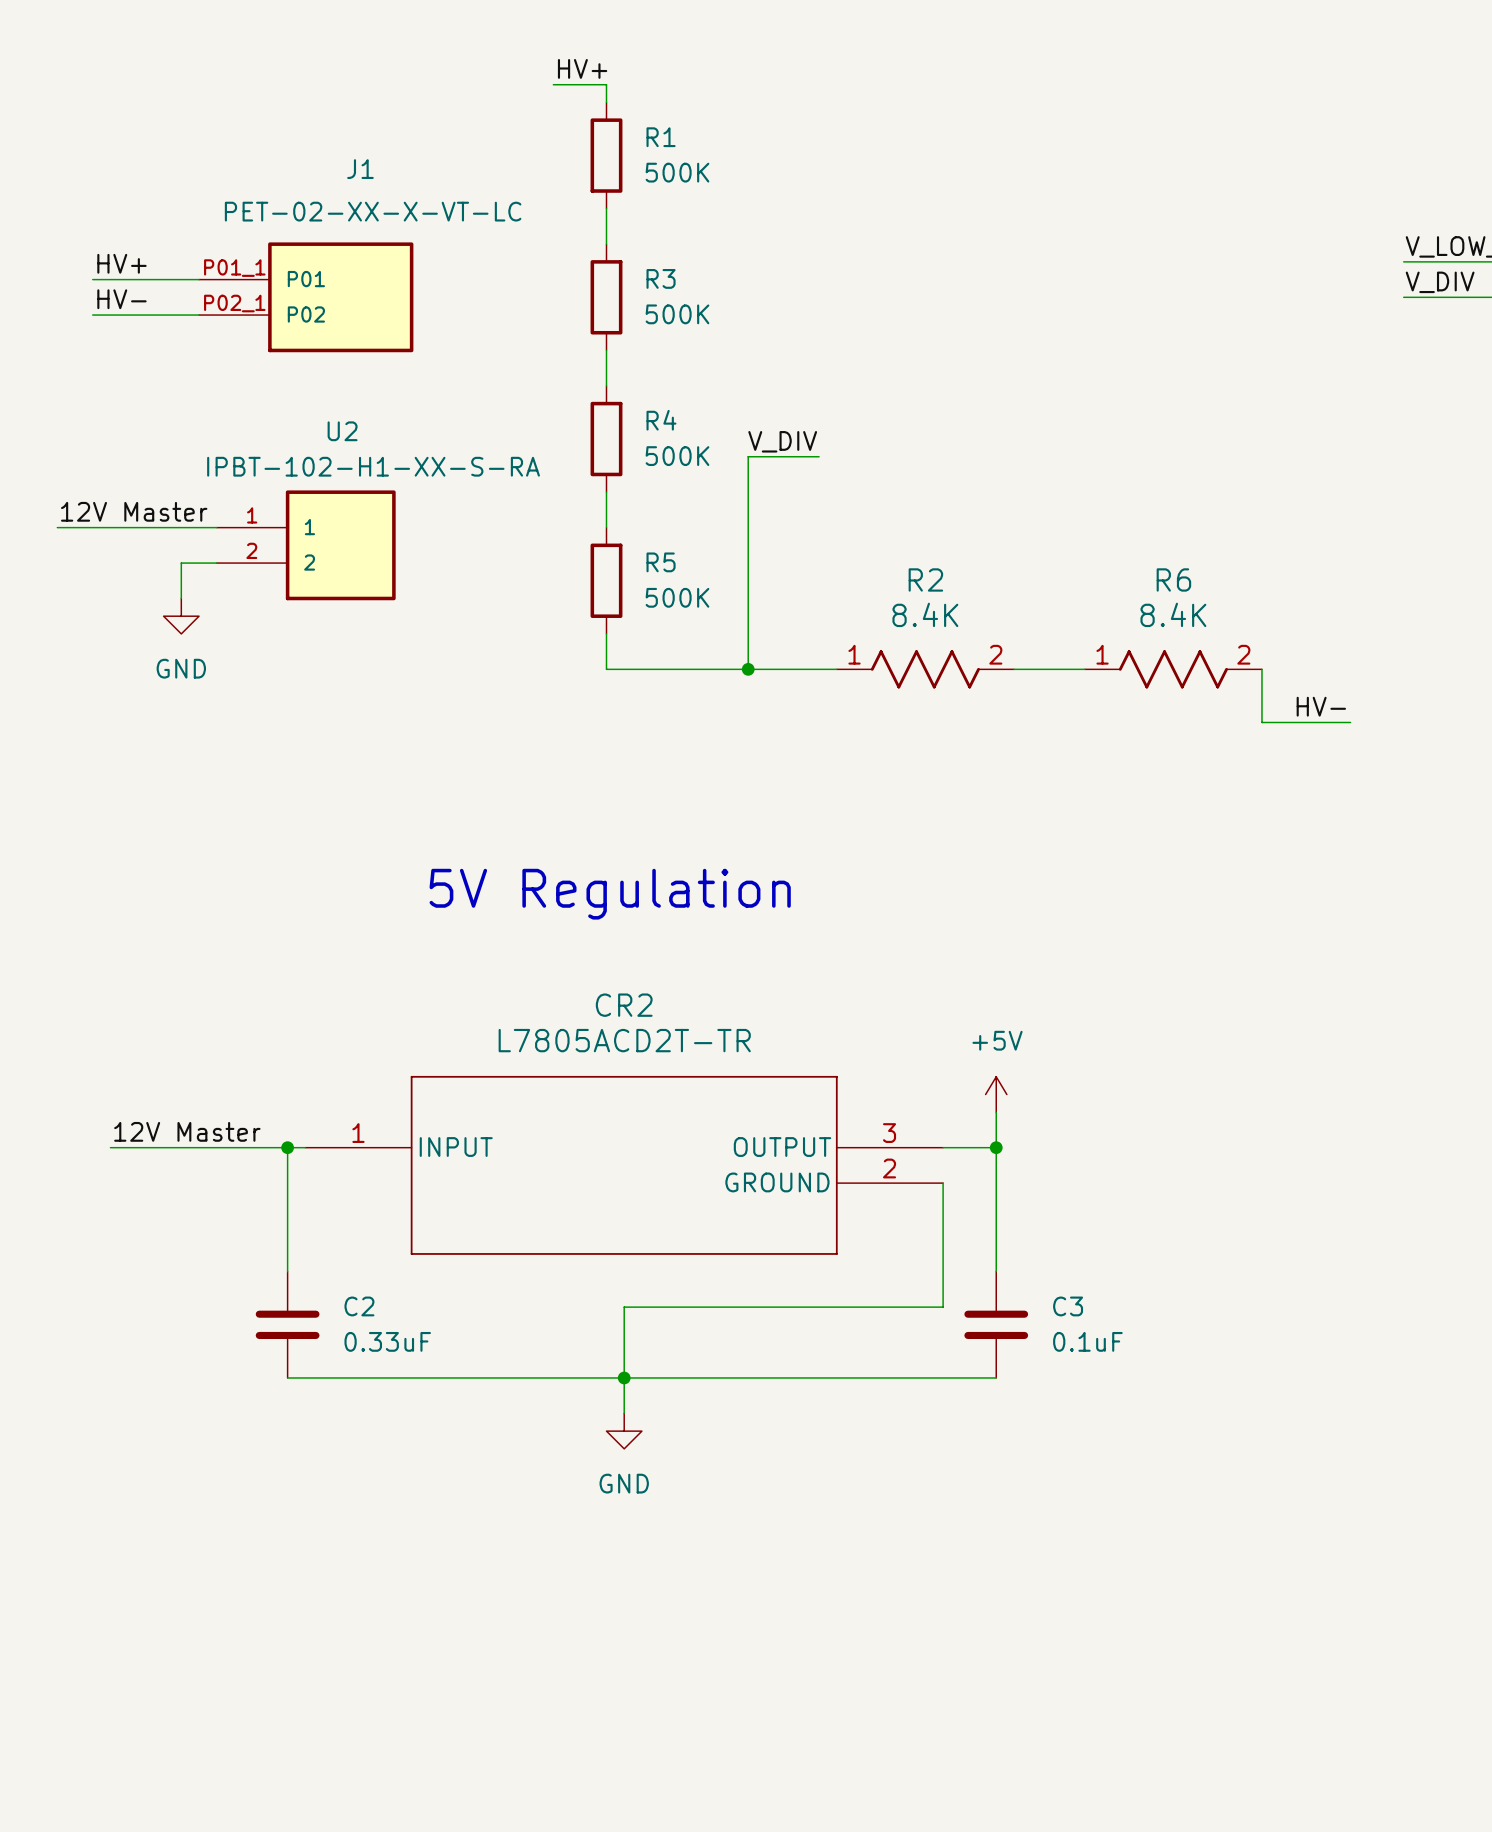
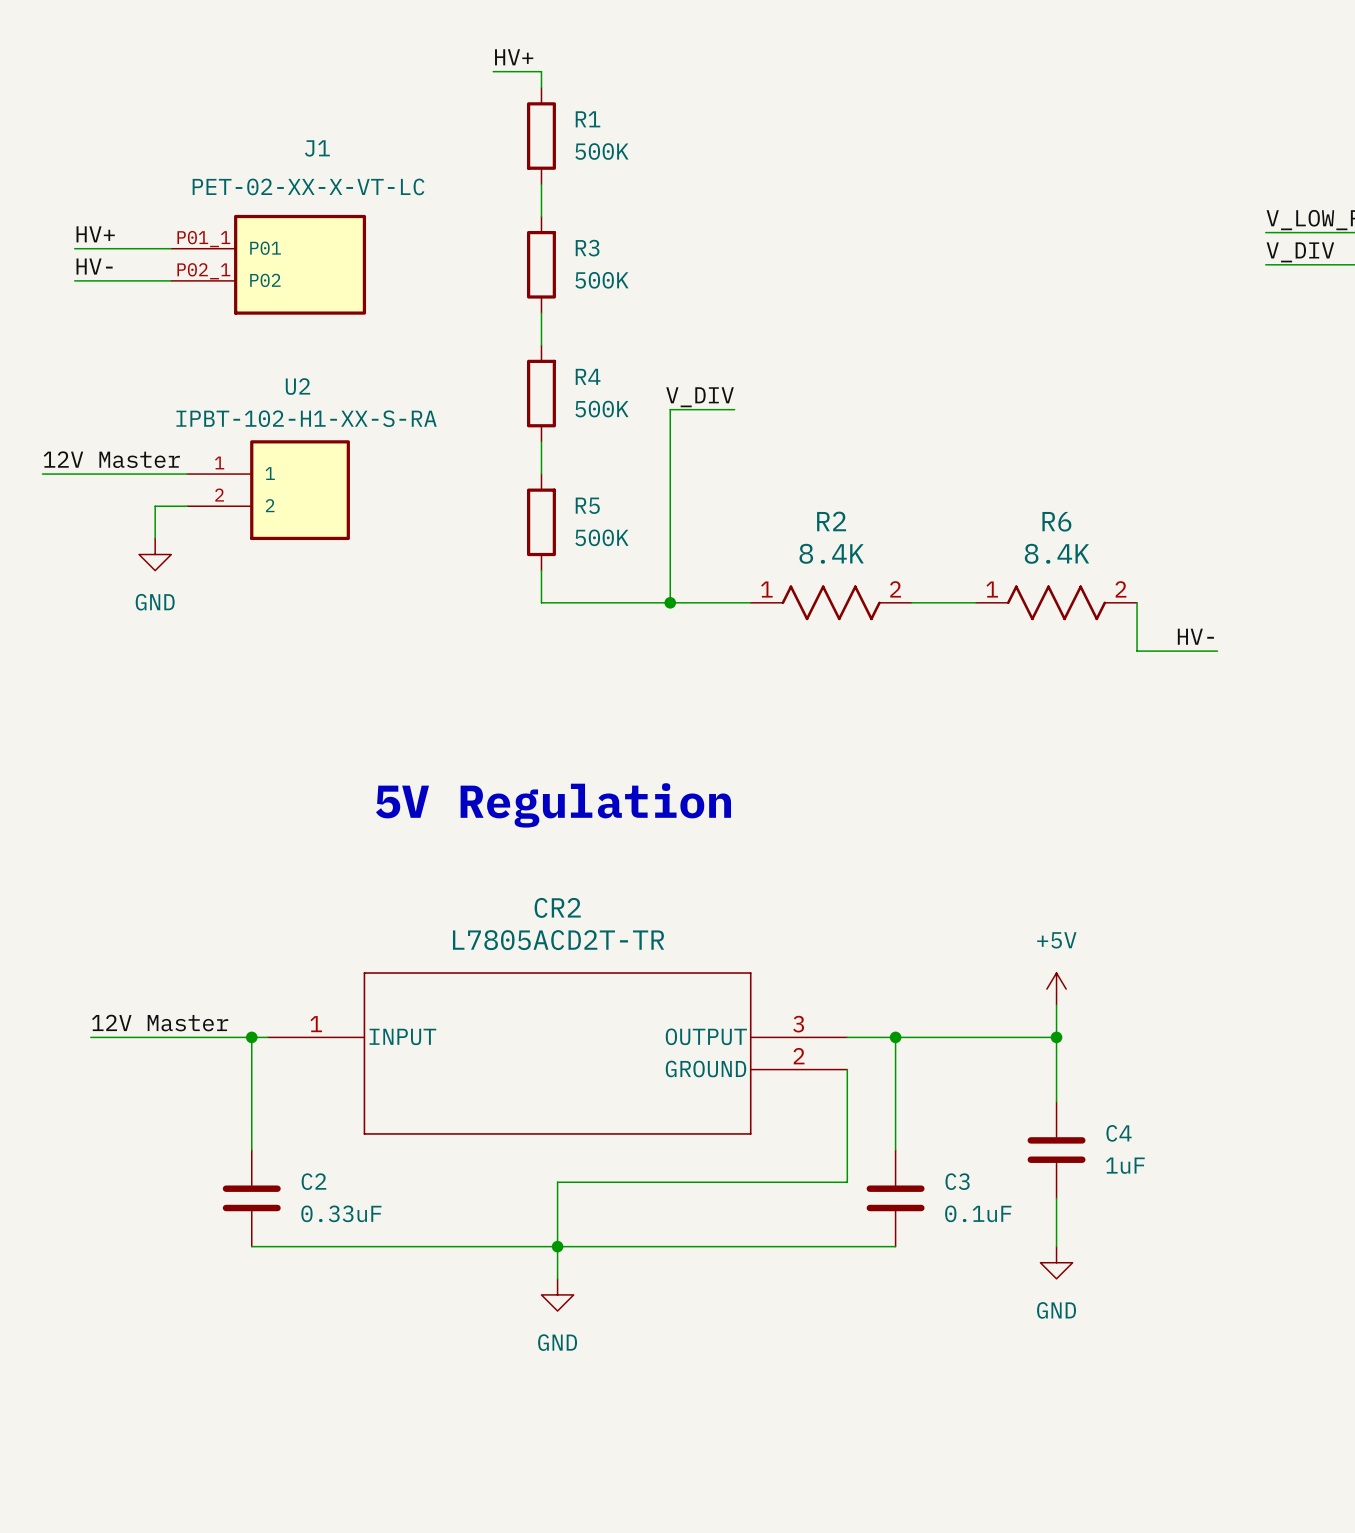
power symbol position: +5V (996, 1094) -> +5V (1056, 989)
wire: (996, 1112) (996, 1147) -> (1056, 1037) (895, 1037)
wire: none -> (1056, 1005) (1056, 1101)
junction: none -> (1056, 1037)
C4: none -> 1uF (1056, 1150)
wire: none -> (1056, 1198) (1056, 1246)
power symbol: none -> GND (1056, 1262)

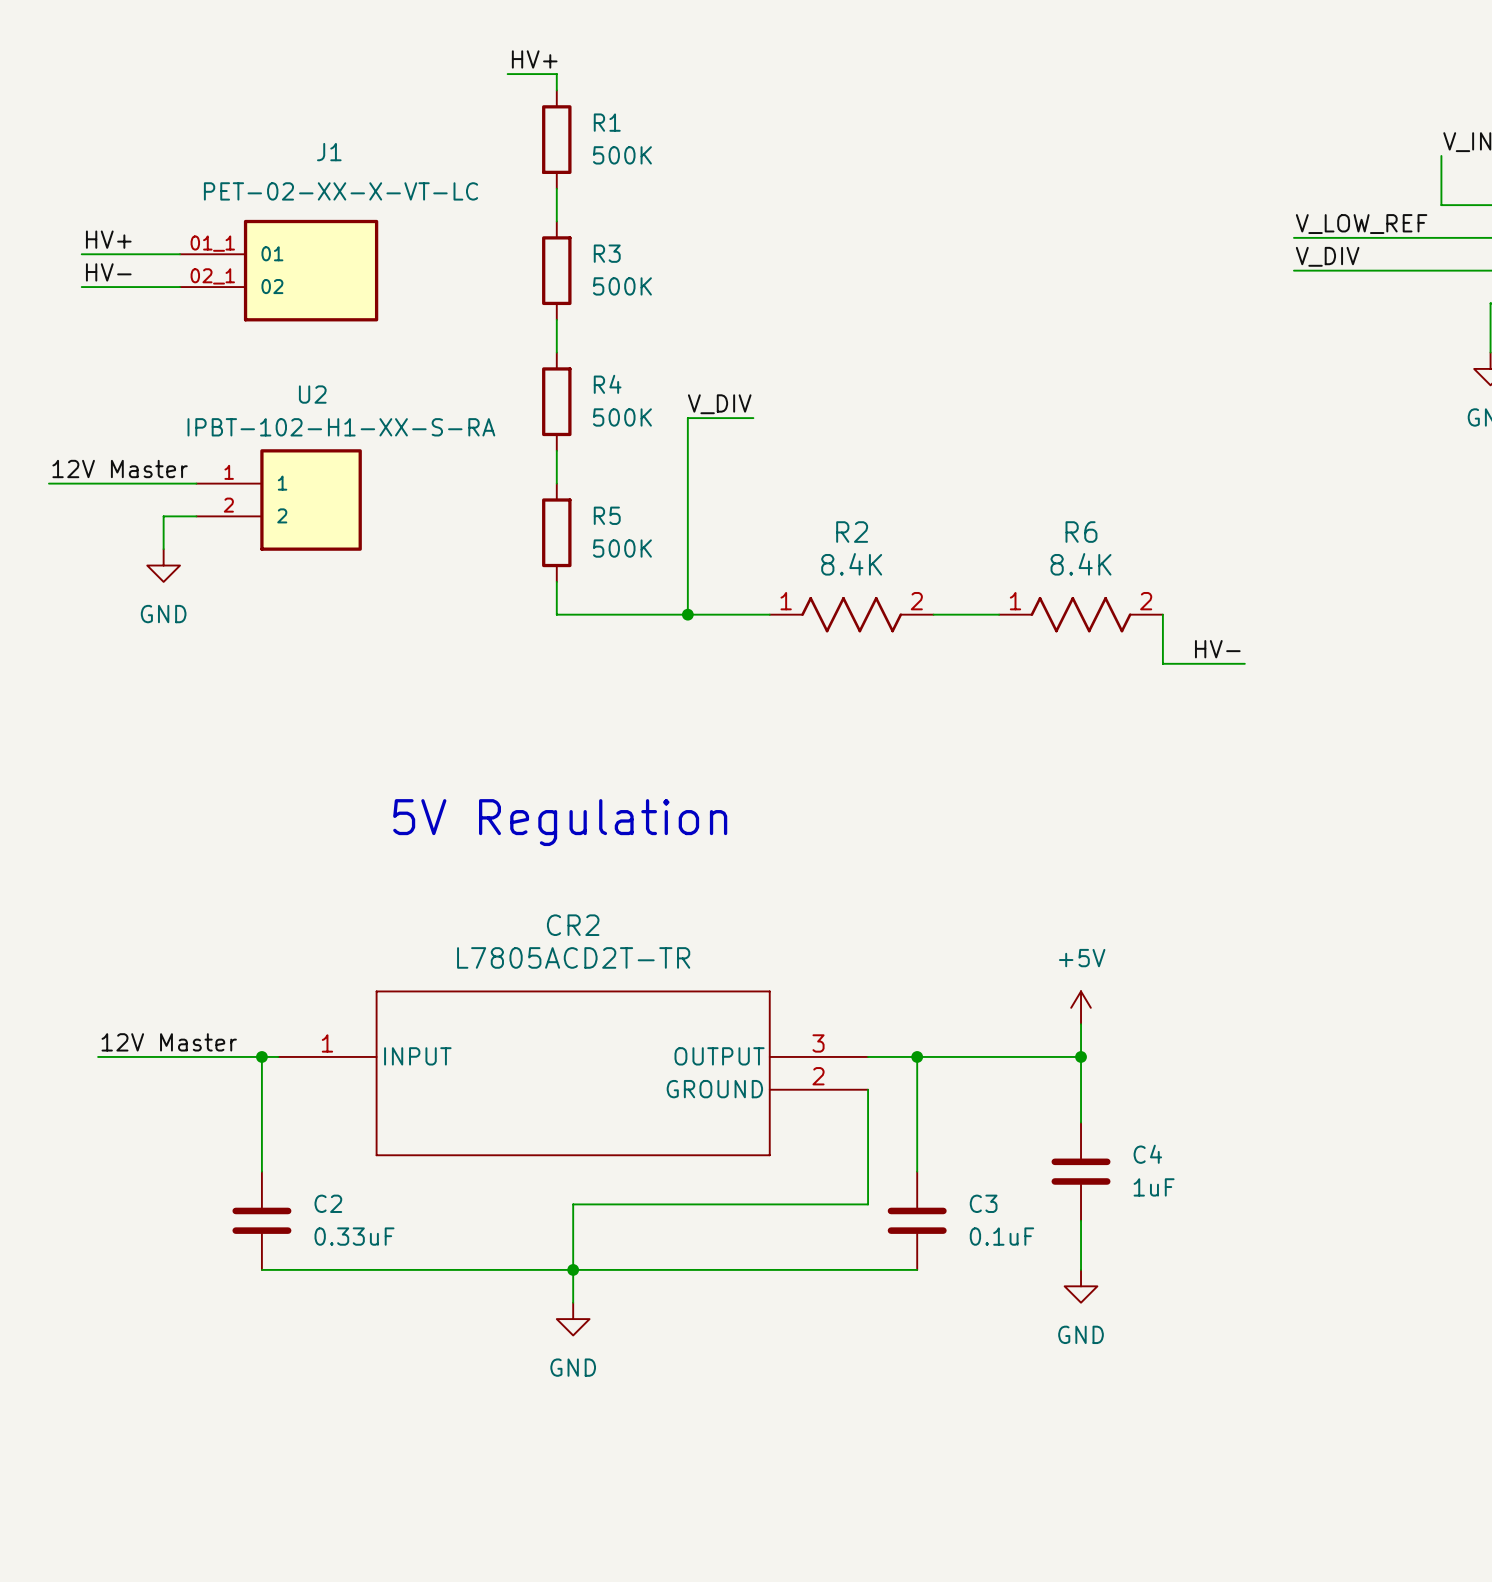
J1 pin number: P01_1 (203, 239) -> 01_1 (212, 243)
J1 pin name: P01 (265, 248) -> 01 (272, 253)
J1 pin number: P02_1 (203, 271) -> 02_1 (212, 276)
J1 pin name: P02 (265, 280) -> 02 (272, 286)

